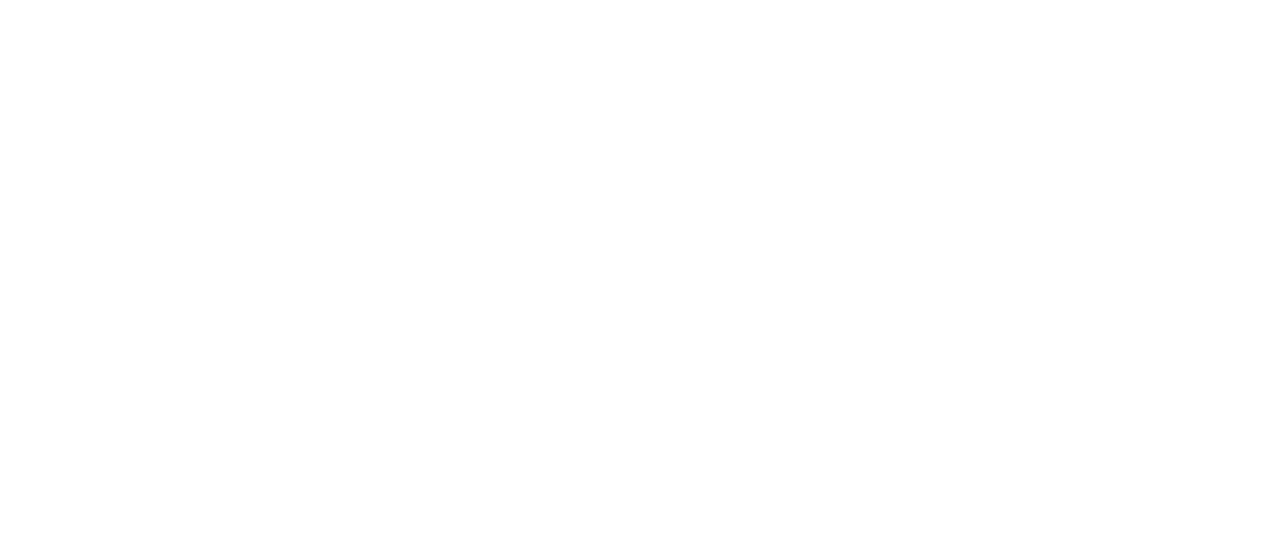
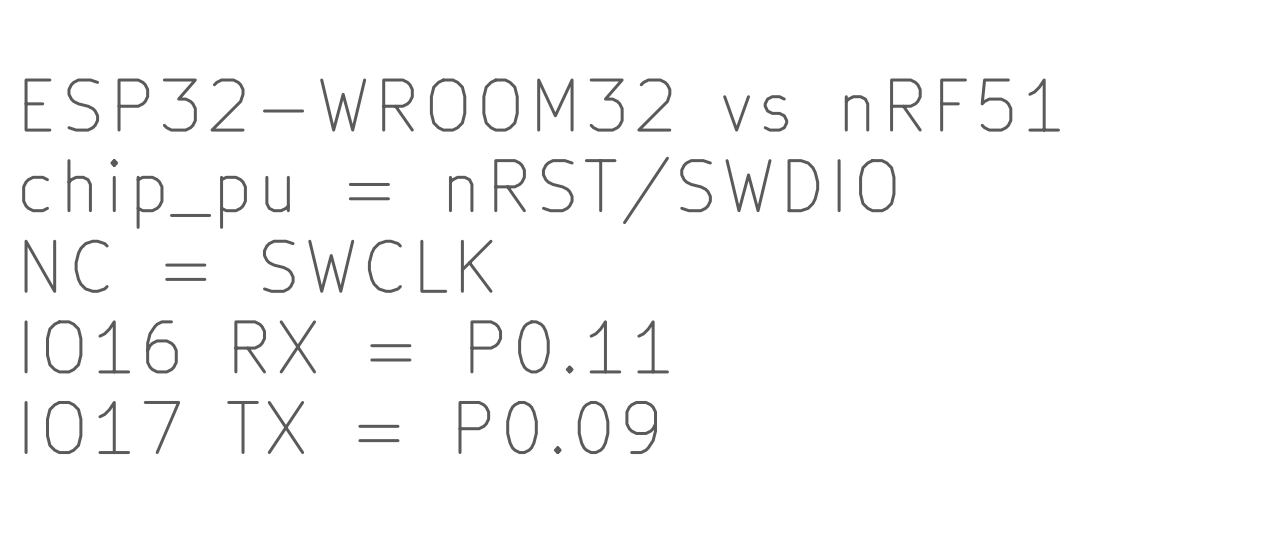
text: none -> ESP32-WROOM32 vs nRF51 (542, 105)
text: none -> chip_pu = nRST/SWDIO (458, 192)
text: none -> NC = SWCLK (258, 266)
text: none -> IO16 RX = P0.11 (346, 346)
text: none -> IO17 TX = P0.09 (340, 427)

